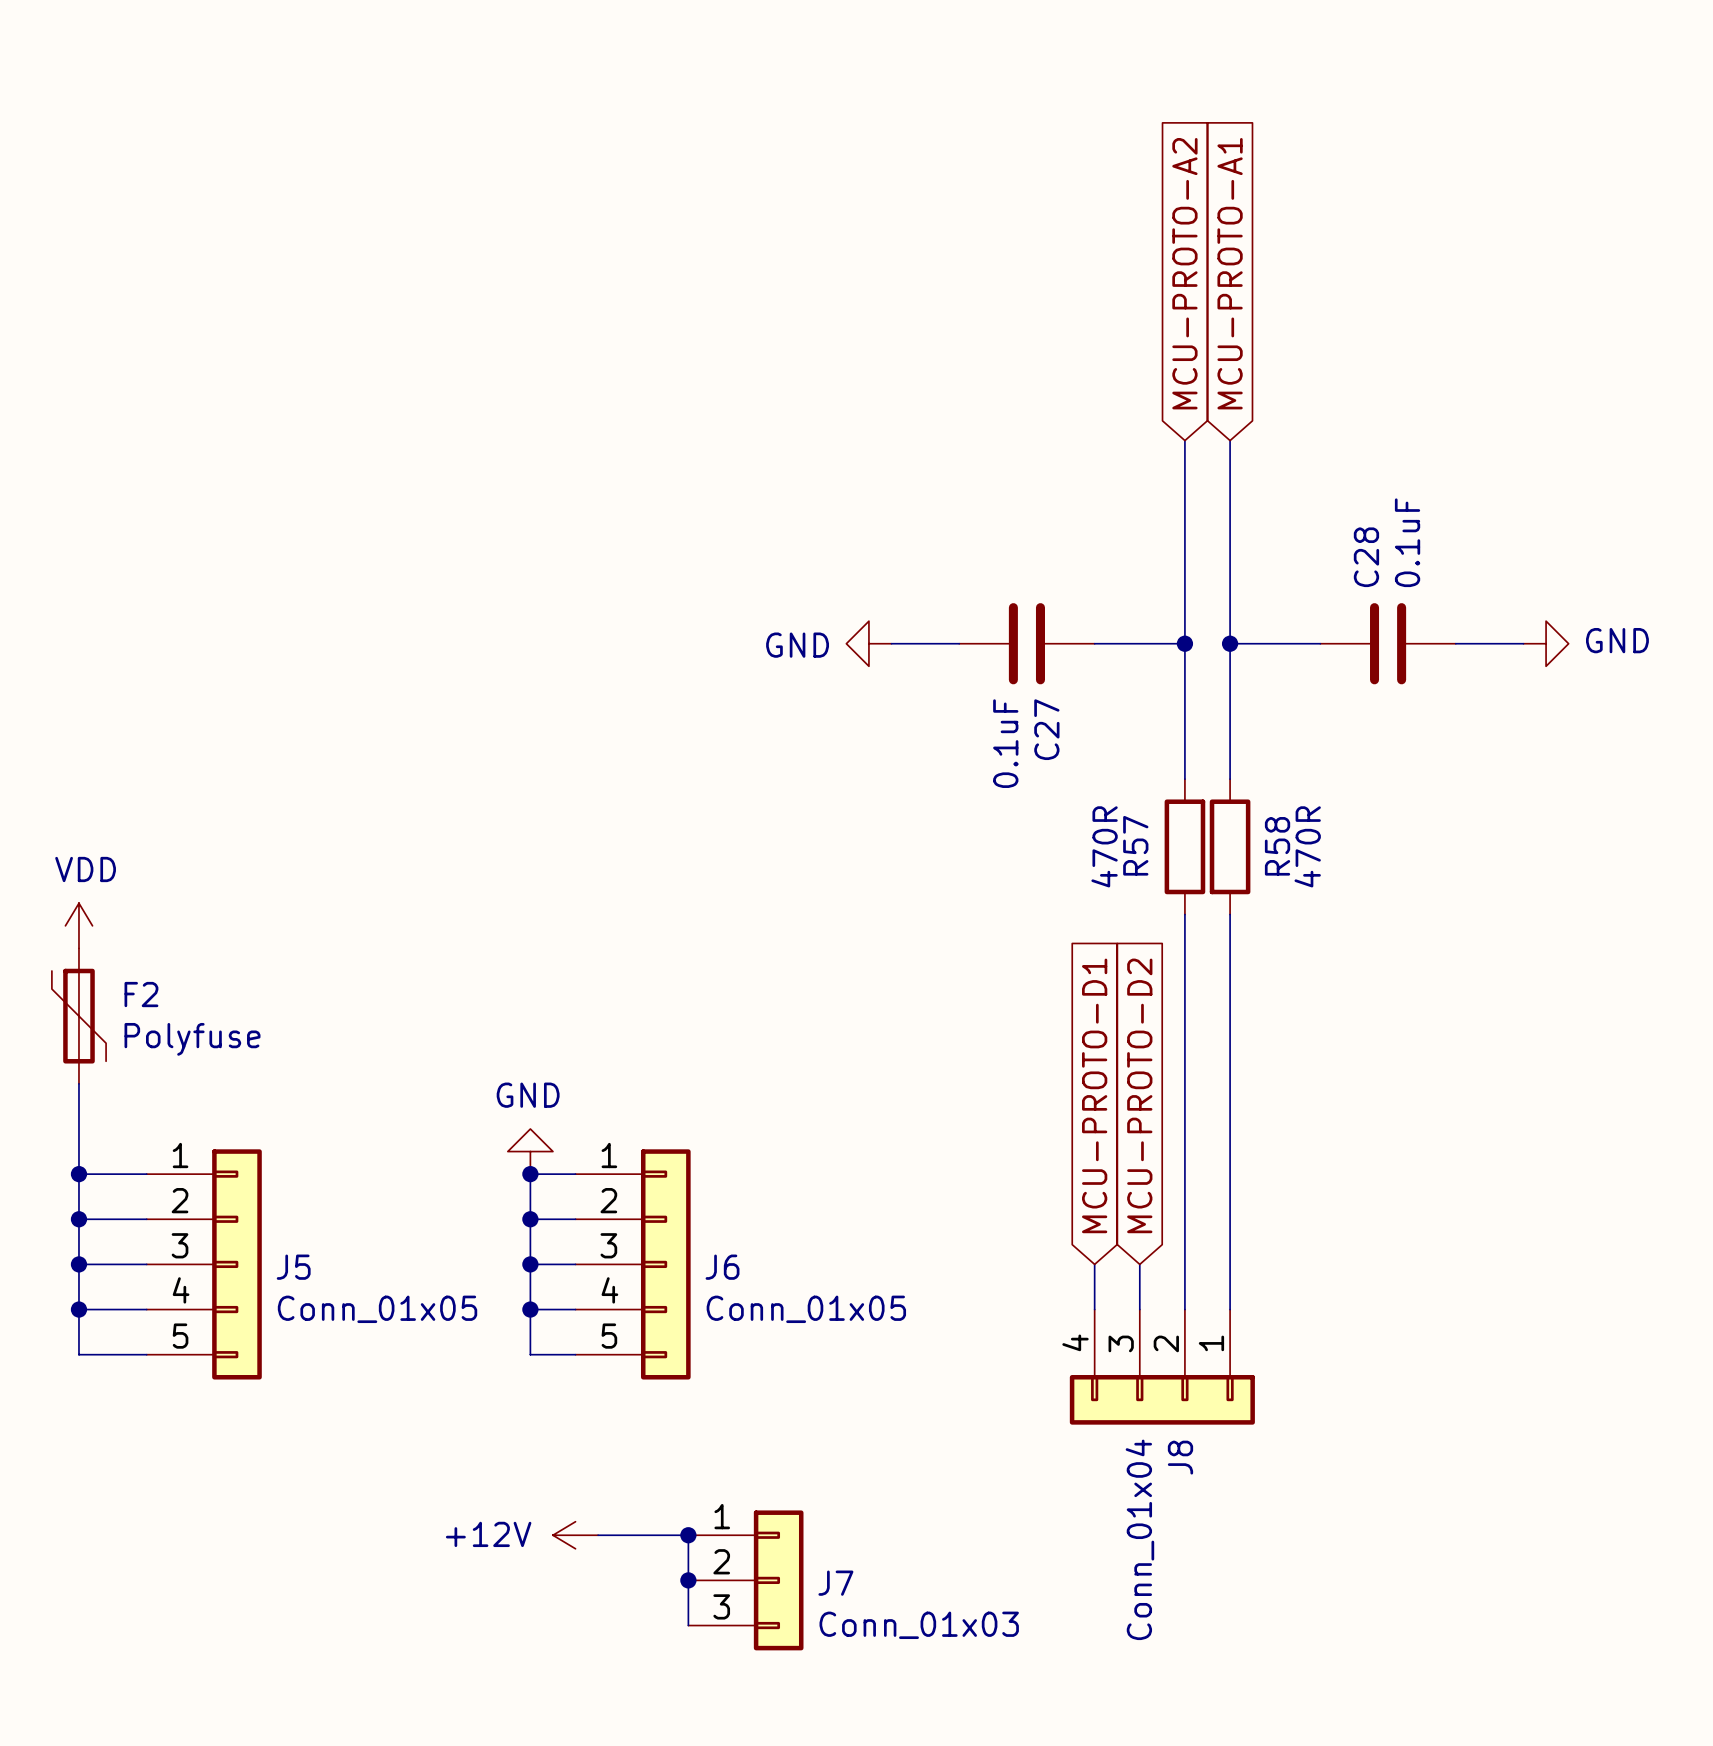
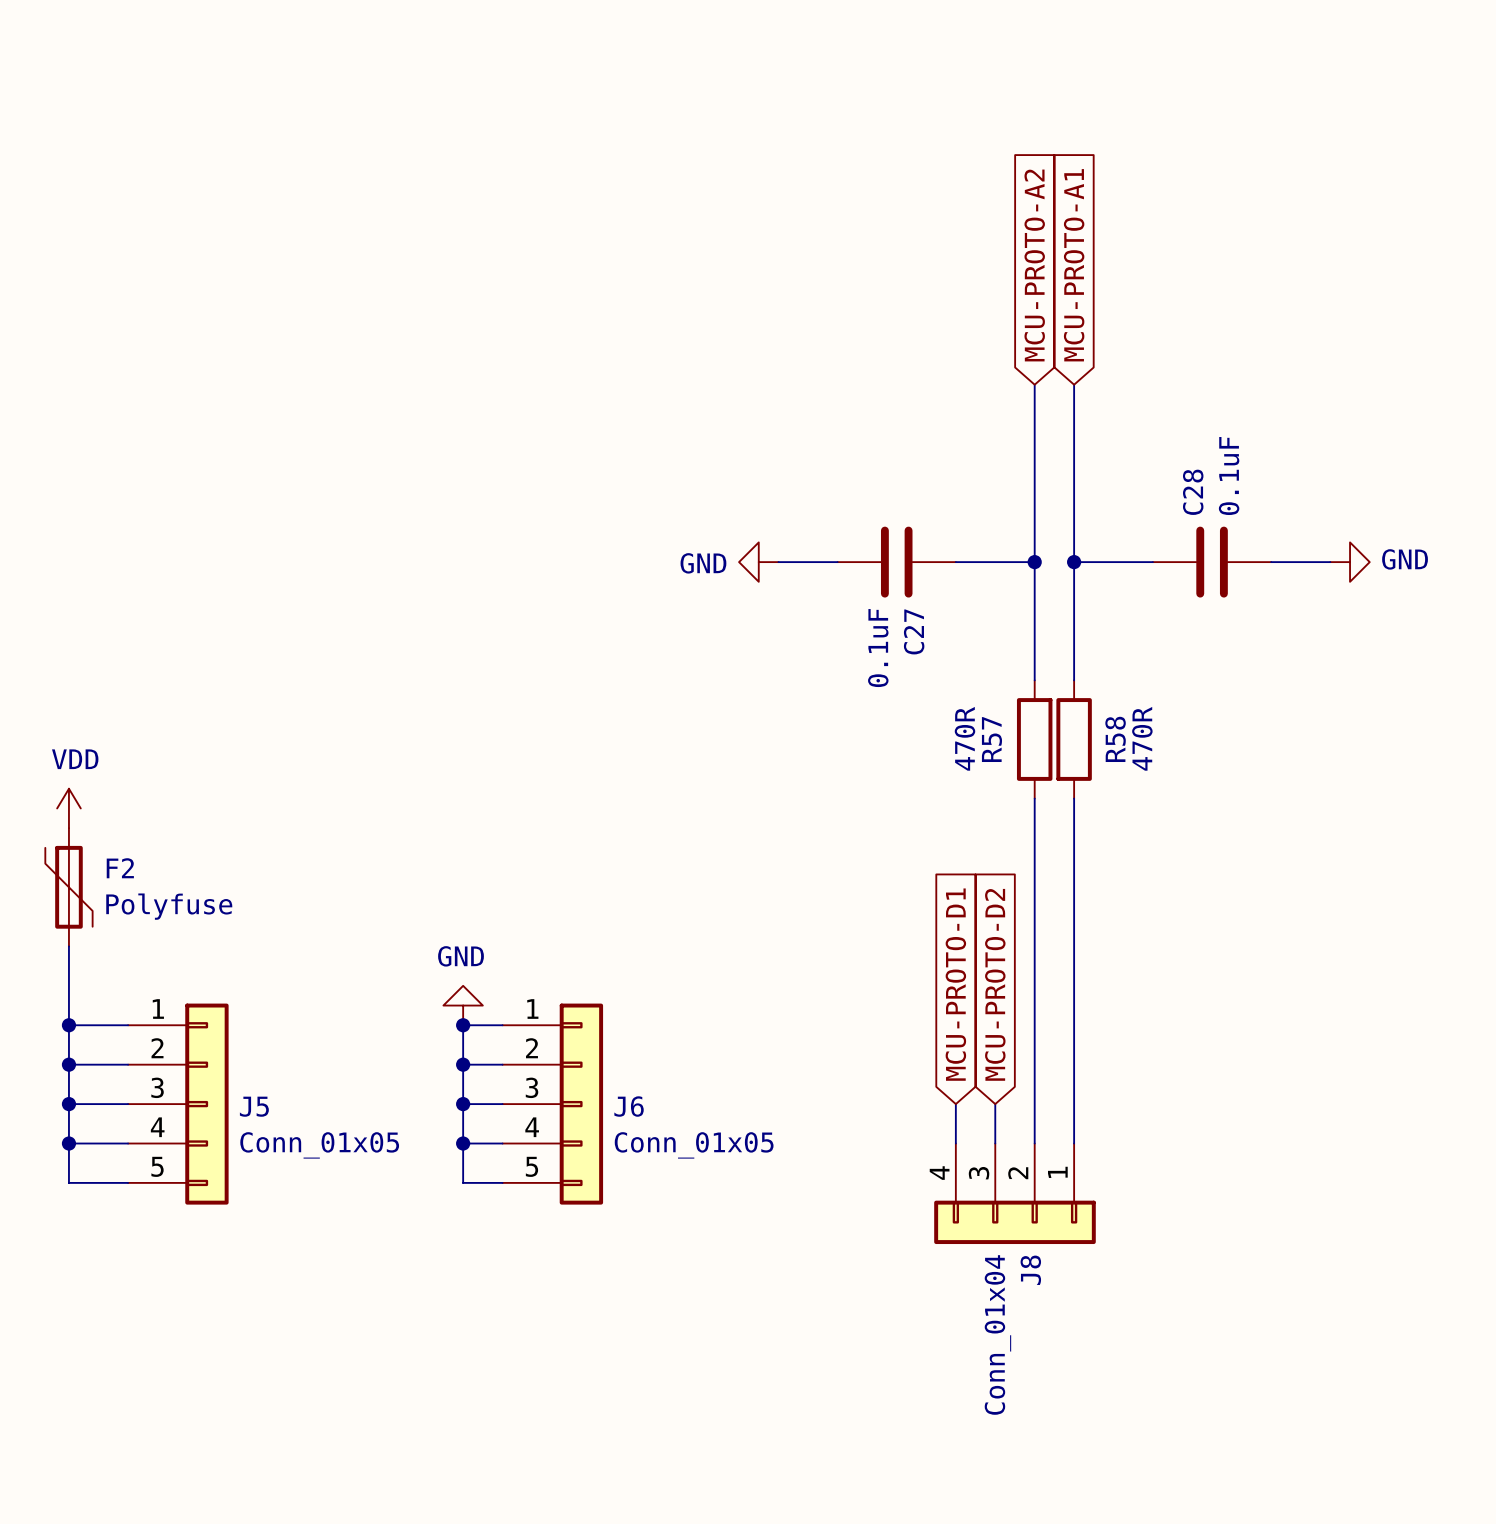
power symbol: +12V (575, 1535) -> none
wire: (598, 1535) (688, 1535) (688, 1625) -> none
junction: (688, 1535) -> none
junction: (688, 1580) -> none
J7: Conn_01x03 (745, 1580) -> none

